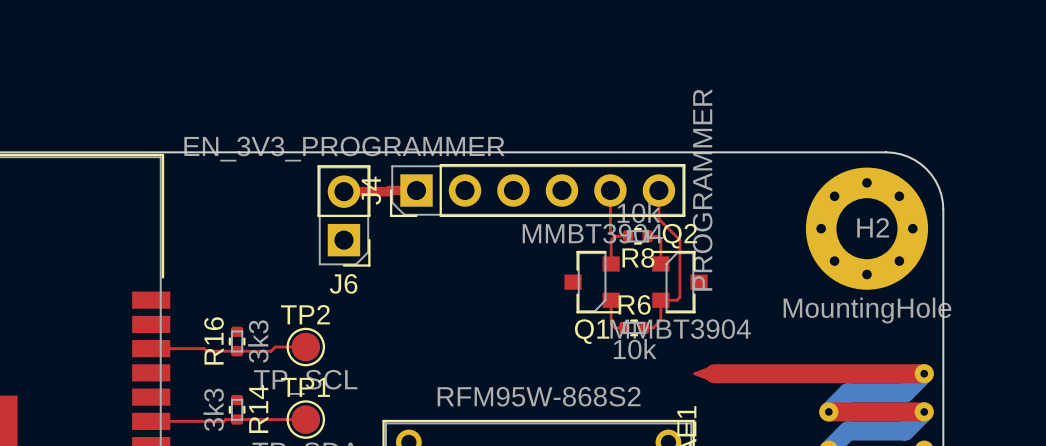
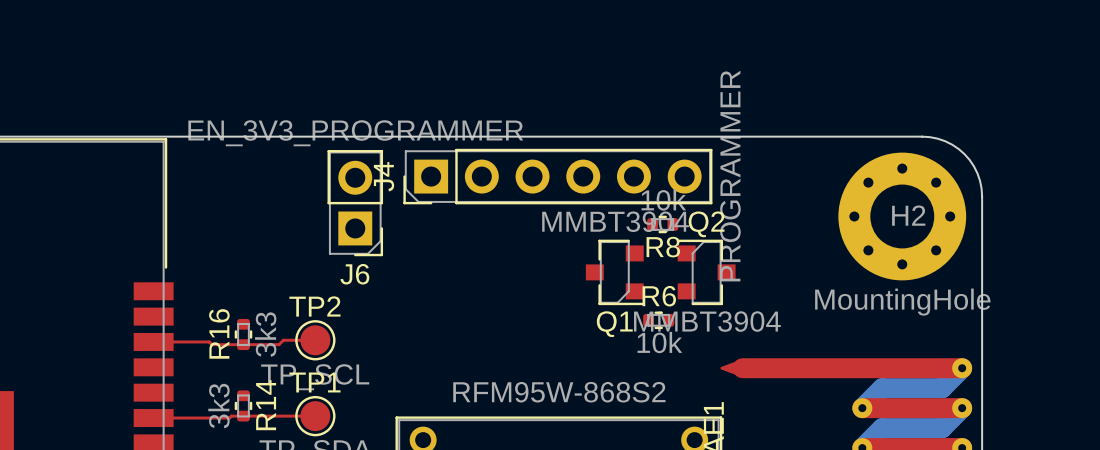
top track: (416, 190) (343, 191) -> none
top track: (610, 190) (610, 231) (615, 236) -> none
top track: (658, 190) (658, 219) (679, 240) (679, 297) (677, 300) (660, 300) (660, 320) (653, 327) (643, 327) -> none
top track: (615, 236) (628, 236) -> none
top track: (615, 236) (611, 240) (611, 263) -> none
top track: (647, 236) (657, 236) (660, 240) (660, 263) -> none
top track: (611, 300) (611, 324) (615, 327) (624, 327) -> none

